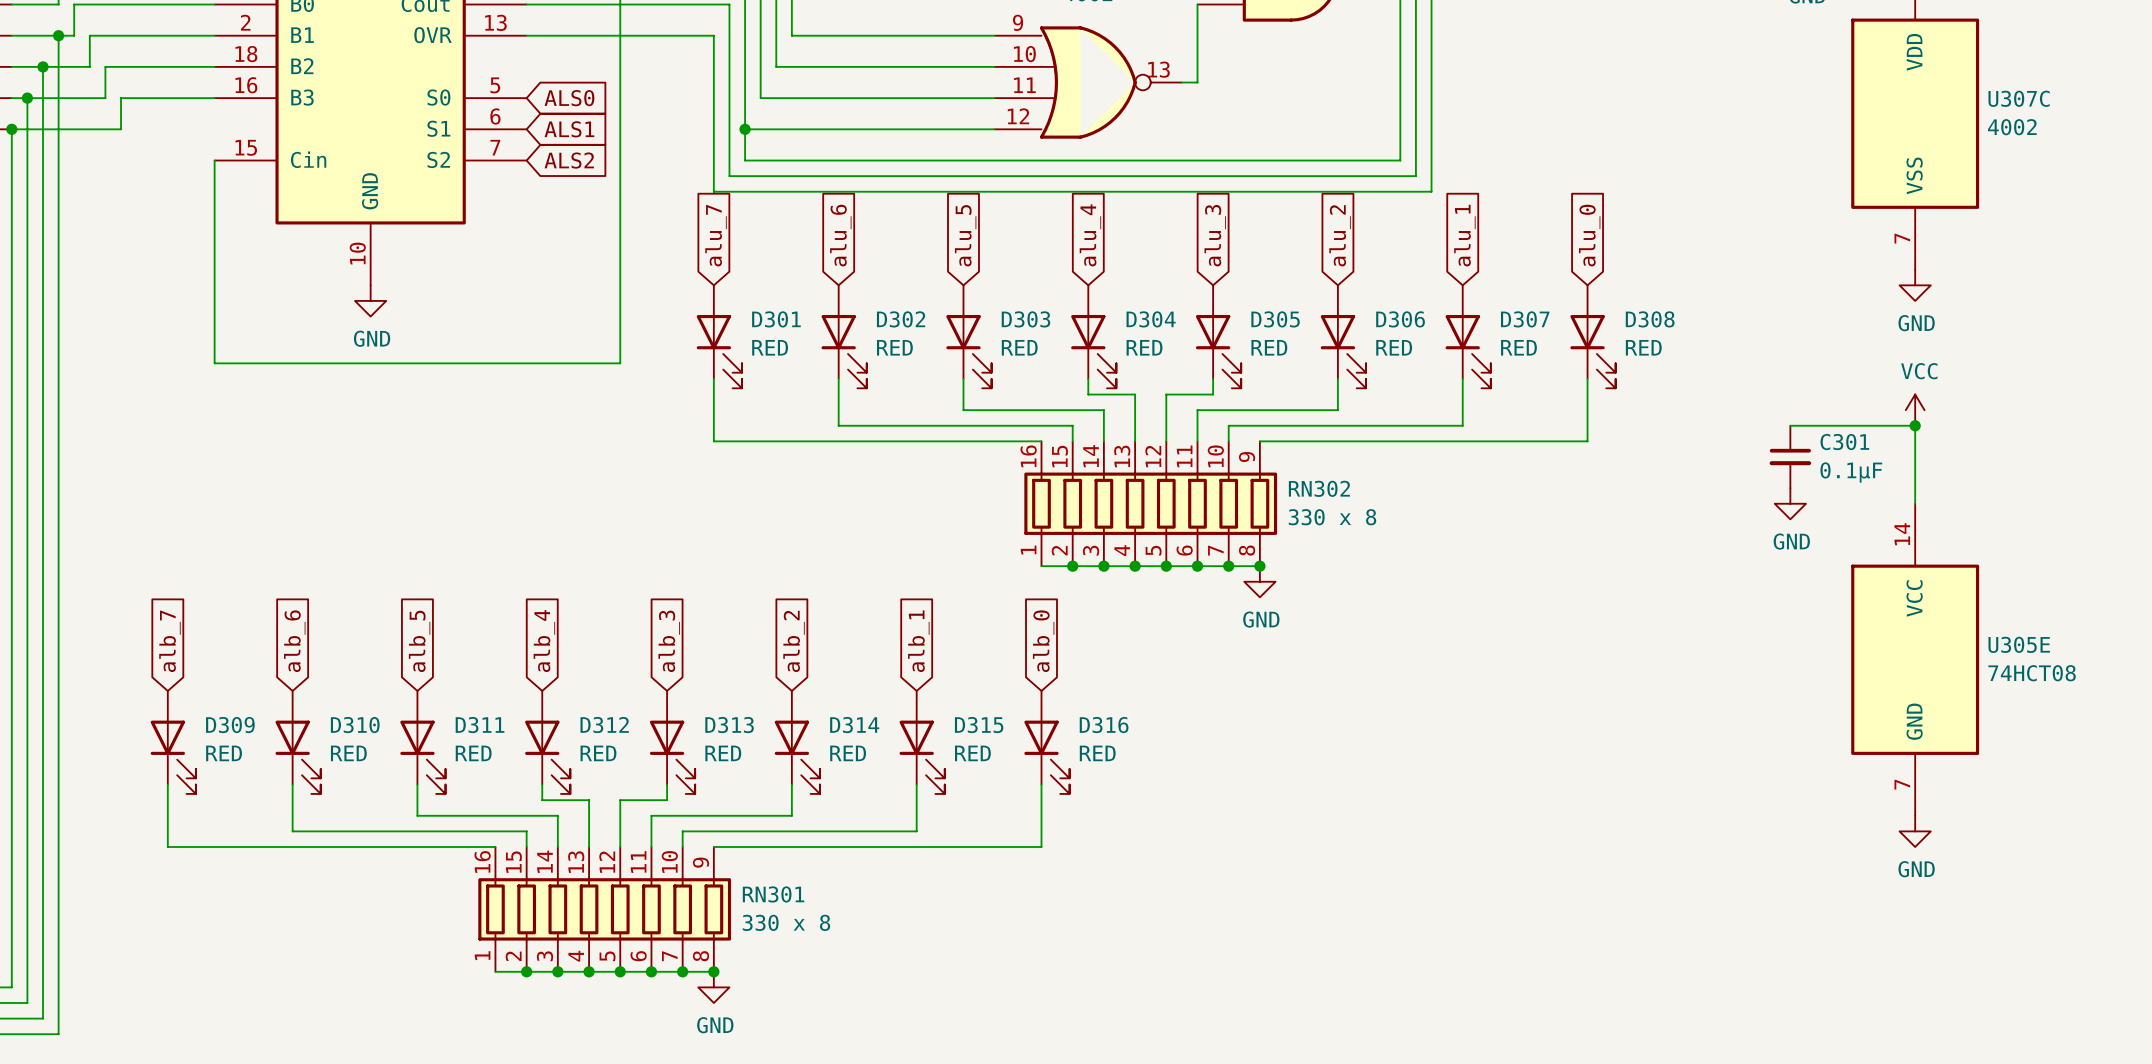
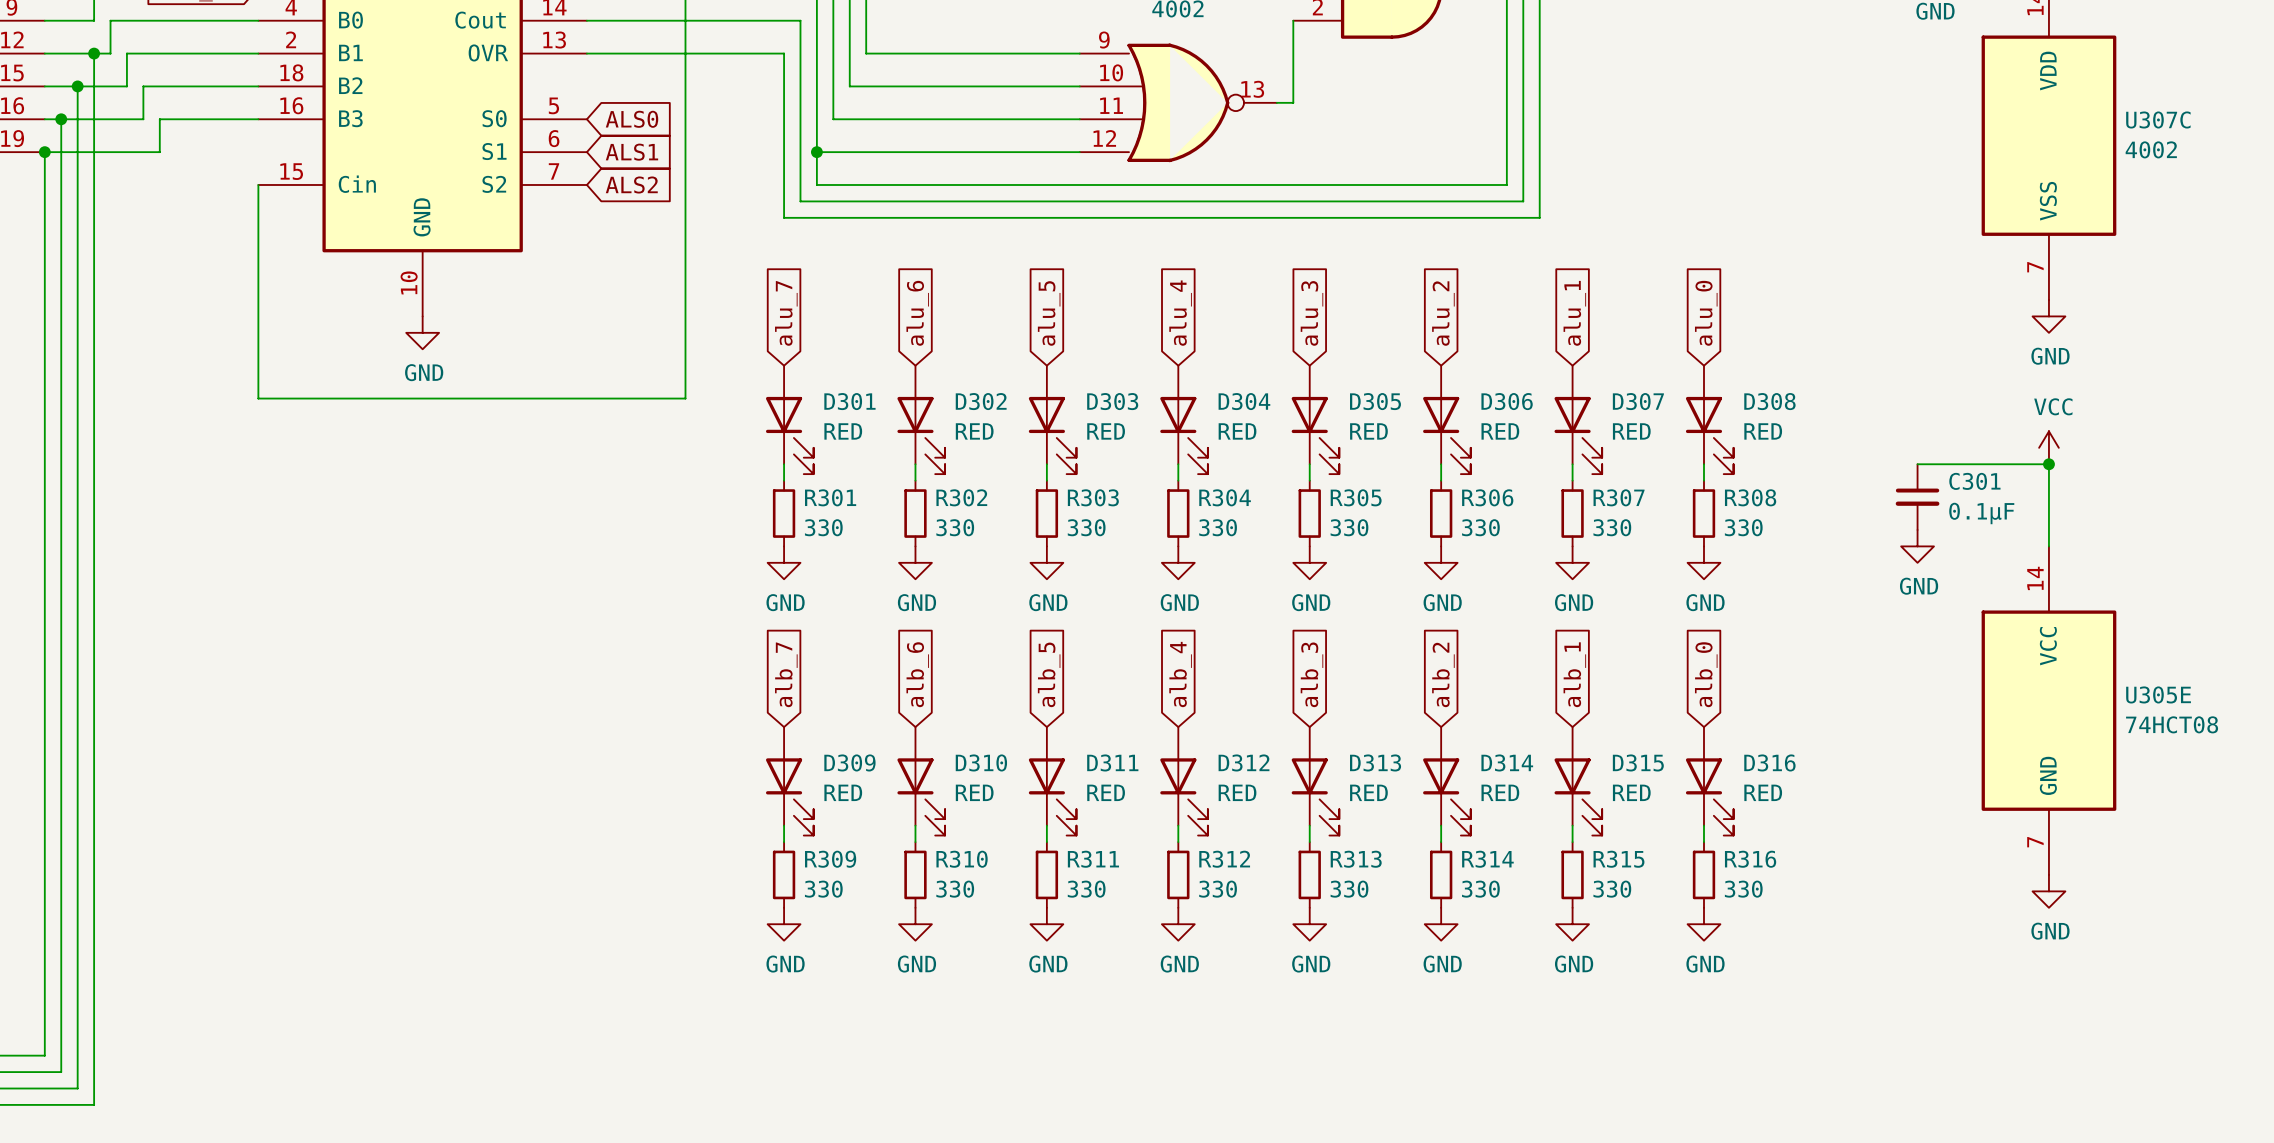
global label position: alu_7 (716, 235) -> alu_7 (786, 313)
global label position: alu_6 (840, 235) -> alu_6 (917, 313)
global label position: alu_5 (965, 235) -> alu_5 (1049, 313)
global label position: alu_4 (1090, 235) -> alu_4 (1180, 313)
global label position: alu_3 (1215, 235) -> alu_3 (1311, 313)
global label position: alu_2 (1340, 235) -> alu_2 (1443, 313)
global label position: alu_1 (1464, 235) -> alu_1 (1574, 313)
global label position: alu_0 (1589, 235) -> alu_0 (1706, 313)
D301 position: (719, 336) -> (789, 419)
D302 position: (844, 336) -> (921, 419)
D303 position: (968, 336) -> (1052, 419)
D304 position: (1093, 336) -> (1184, 419)
D305 position: (1218, 336) -> (1315, 419)
D306 position: (1343, 336) -> (1446, 419)
D307 position: (1468, 336) -> (1578, 419)
D308 position: (1593, 336) -> (1709, 419)
wire: (838, 378) (838, 425) (1072, 425) (1072, 441) -> none
wire: (963, 378) (963, 410) (1103, 410) (1103, 441) -> none
wire: (1088, 378) (1088, 394) (1135, 394) (1135, 441) -> none
wire: (1213, 378) (1213, 394) (1166, 394) (1166, 441) -> none
wire: (1337, 378) (1337, 410) (1197, 410) (1197, 441) -> none
wire: (1462, 378) (1462, 425) (1228, 425) (1228, 441) -> none
wire: none -> (915, 464) (915, 480)
wire: none -> (1046, 464) (1046, 480)
wire: none -> (1178, 464) (1178, 480)
wire: none -> (1309, 464) (1309, 480)
wire: none -> (1441, 464) (1441, 480)
wire: none -> (1572, 464) (1572, 480)
wire: (713, 441) (1041, 441) -> none
wire: (1259, 441) (1587, 441) -> none
R301: none -> 330 (784, 513)
R302: none -> 330 (915, 513)
R303: none -> 330 (1046, 513)
R304: none -> 330 (1178, 513)
R305: none -> 330 (1309, 513)
R306: none -> 330 (1441, 513)
R307: none -> 330 (1572, 513)
R308: none -> 330 (1703, 513)
RN302: 330 x 8 (1150, 503) -> none
power symbol: none -> GND (784, 562)
power symbol: none -> GND (915, 562)
power symbol: none -> GND (1046, 562)
power symbol: none -> GND (1178, 562)
power symbol: none -> GND (1309, 562)
power symbol: none -> GND (1441, 562)
power symbol: none -> GND (1572, 562)
power symbol: none -> GND (1703, 562)
wire: (1041, 566) (1259, 566) -> none
junction: (1072, 566) -> none
junction: (1103, 566) -> none
junction: (1135, 566) -> none
junction: (1166, 566) -> none
junction: (1197, 566) -> none
junction: (1228, 566) -> none
junction: (1259, 566) -> none
power symbol: GND (1259, 581) -> none
global label: none -> alb_7 (786, 674)
global label: none -> alb_6 (917, 674)
global label: none -> alb_5 (1049, 674)
global label: none -> alb_4 (1180, 674)
global label: none -> alb_3 (1311, 674)
global label: none -> alb_2 (1443, 674)
global label: none -> alb_1 (1574, 674)
global label: none -> alb_0 (1706, 674)
global label: alb_7 (169, 641) -> none
global label: alb_6 (294, 641) -> none
global label: alb_5 (419, 641) -> none
global label: alb_4 (544, 641) -> none
global label: alb_3 (669, 641) -> none
global label: alb_2 (794, 641) -> none
global label: alb_1 (918, 641) -> none
global label: alb_0 (1043, 641) -> none
D309 position: (173, 742) -> (789, 781)
D310 position: (298, 742) -> (921, 781)
D311 position: (422, 742) -> (1052, 781)
D312 position: (547, 742) -> (1184, 781)
D313 position: (672, 742) -> (1315, 781)
D314 position: (797, 742) -> (1446, 781)
D315 position: (922, 742) -> (1578, 781)
D316 position: (1046, 742) -> (1709, 781)
wire: none -> (784, 825) (784, 842)
wire: none -> (915, 825) (915, 842)
wire: none -> (1046, 825) (1046, 842)
wire: none -> (1178, 825) (1178, 842)
wire: none -> (1309, 825) (1309, 842)
wire: none -> (1441, 825) (1441, 842)
wire: none -> (1572, 825) (1572, 842)
wire: none -> (1703, 825) (1703, 842)
wire: (167, 784) (167, 846) (495, 846) -> none
wire: (292, 784) (292, 831) (526, 831) (526, 846) -> none
wire: (417, 784) (417, 815) (557, 815) (557, 846) -> none
wire: (542, 784) (542, 800) (589, 800) (589, 846) -> none
wire: (667, 784) (667, 800) (620, 800) (620, 846) -> none
wire: (791, 784) (791, 815) (651, 815) (651, 846) -> none
wire: (916, 784) (916, 831) (682, 831) (682, 846) -> none
wire: (1041, 784) (1041, 846) (713, 846) -> none
R309: none -> 330 (784, 874)
R310: none -> 330 (915, 874)
R311: none -> 330 (1046, 874)
R312: none -> 330 (1178, 874)
R313: none -> 330 (1309, 874)
R314: none -> 330 (1441, 874)
R315: none -> 330 (1572, 874)
R316: none -> 330 (1703, 874)
power symbol: none -> GND (784, 924)
power symbol: none -> GND (915, 924)
power symbol: none -> GND (1046, 924)
power symbol: none -> GND (1178, 924)
power symbol: none -> GND (1309, 924)
power symbol: none -> GND (1441, 924)
power symbol: none -> GND (1572, 924)
power symbol: none -> GND (1703, 924)
RN301: 330 x 8 (604, 909) -> none
wire: (495, 971) (713, 971) -> none
junction: (526, 971) -> none
junction: (557, 971) -> none
junction: (589, 971) -> none
junction: (620, 971) -> none
junction: (651, 971) -> none
junction: (682, 971) -> none
junction: (713, 971) -> none
power symbol: GND (713, 987) -> none

